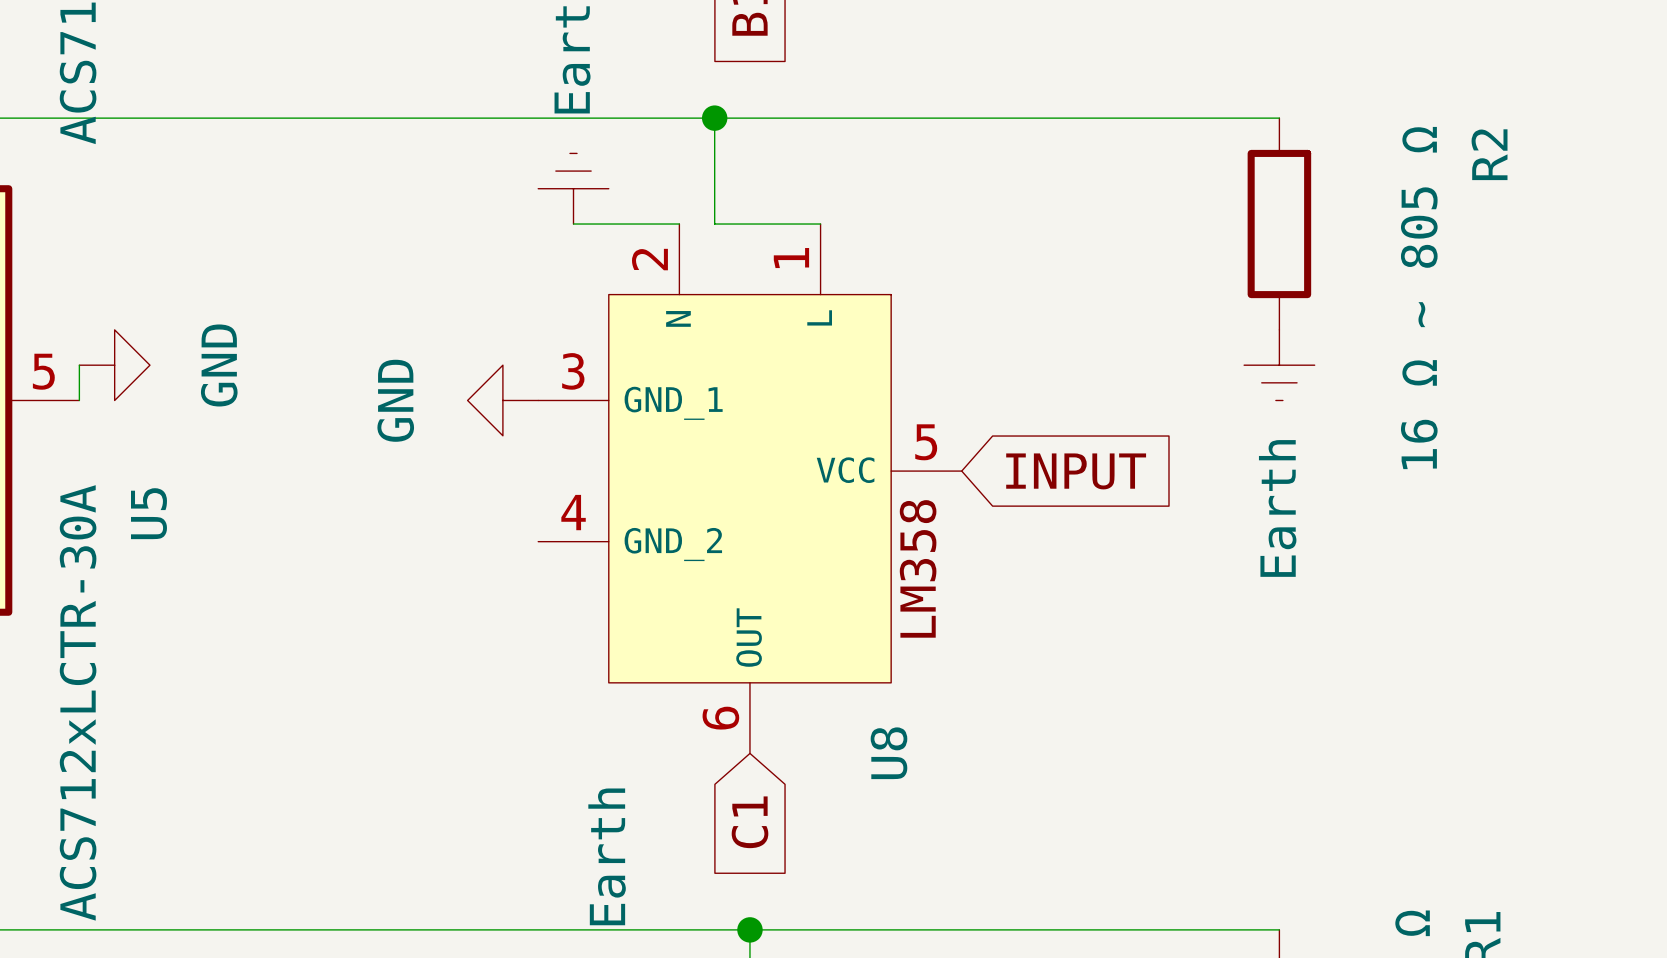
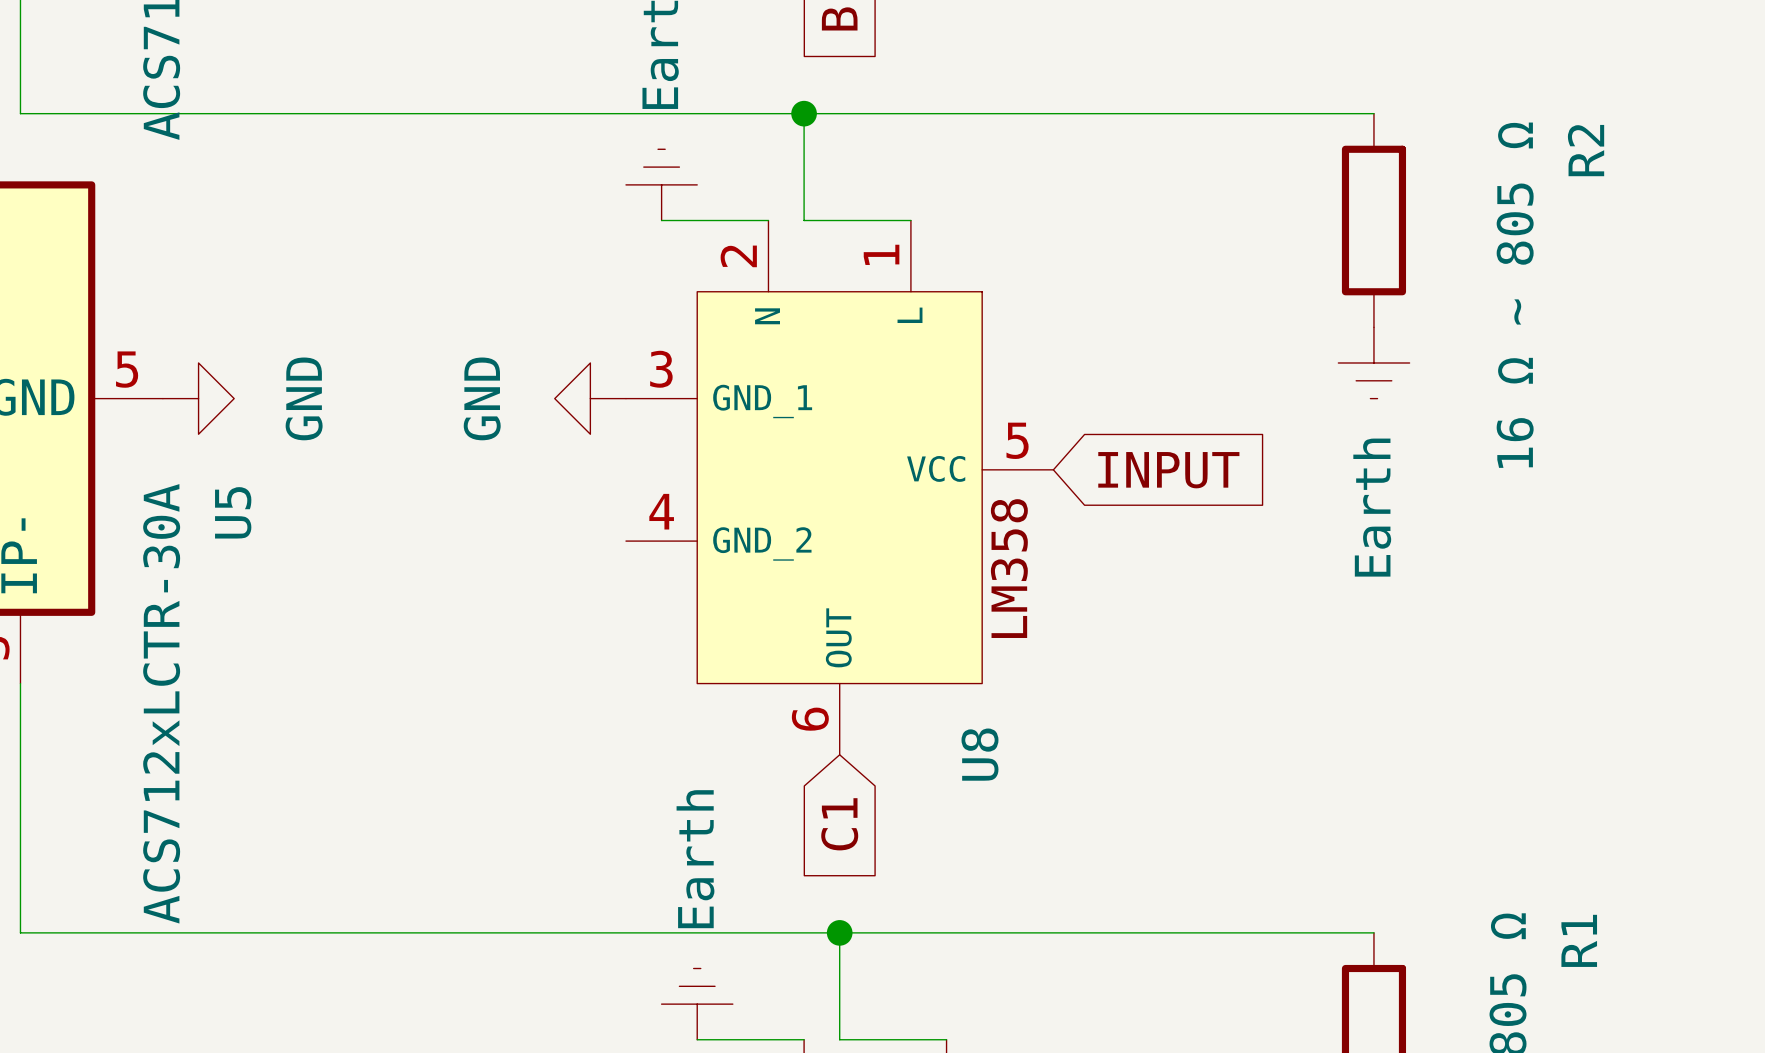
wire: (79, 365) (79, 400) -> none
power symbol position: GND (114, 365) -> GND (198, 398)

